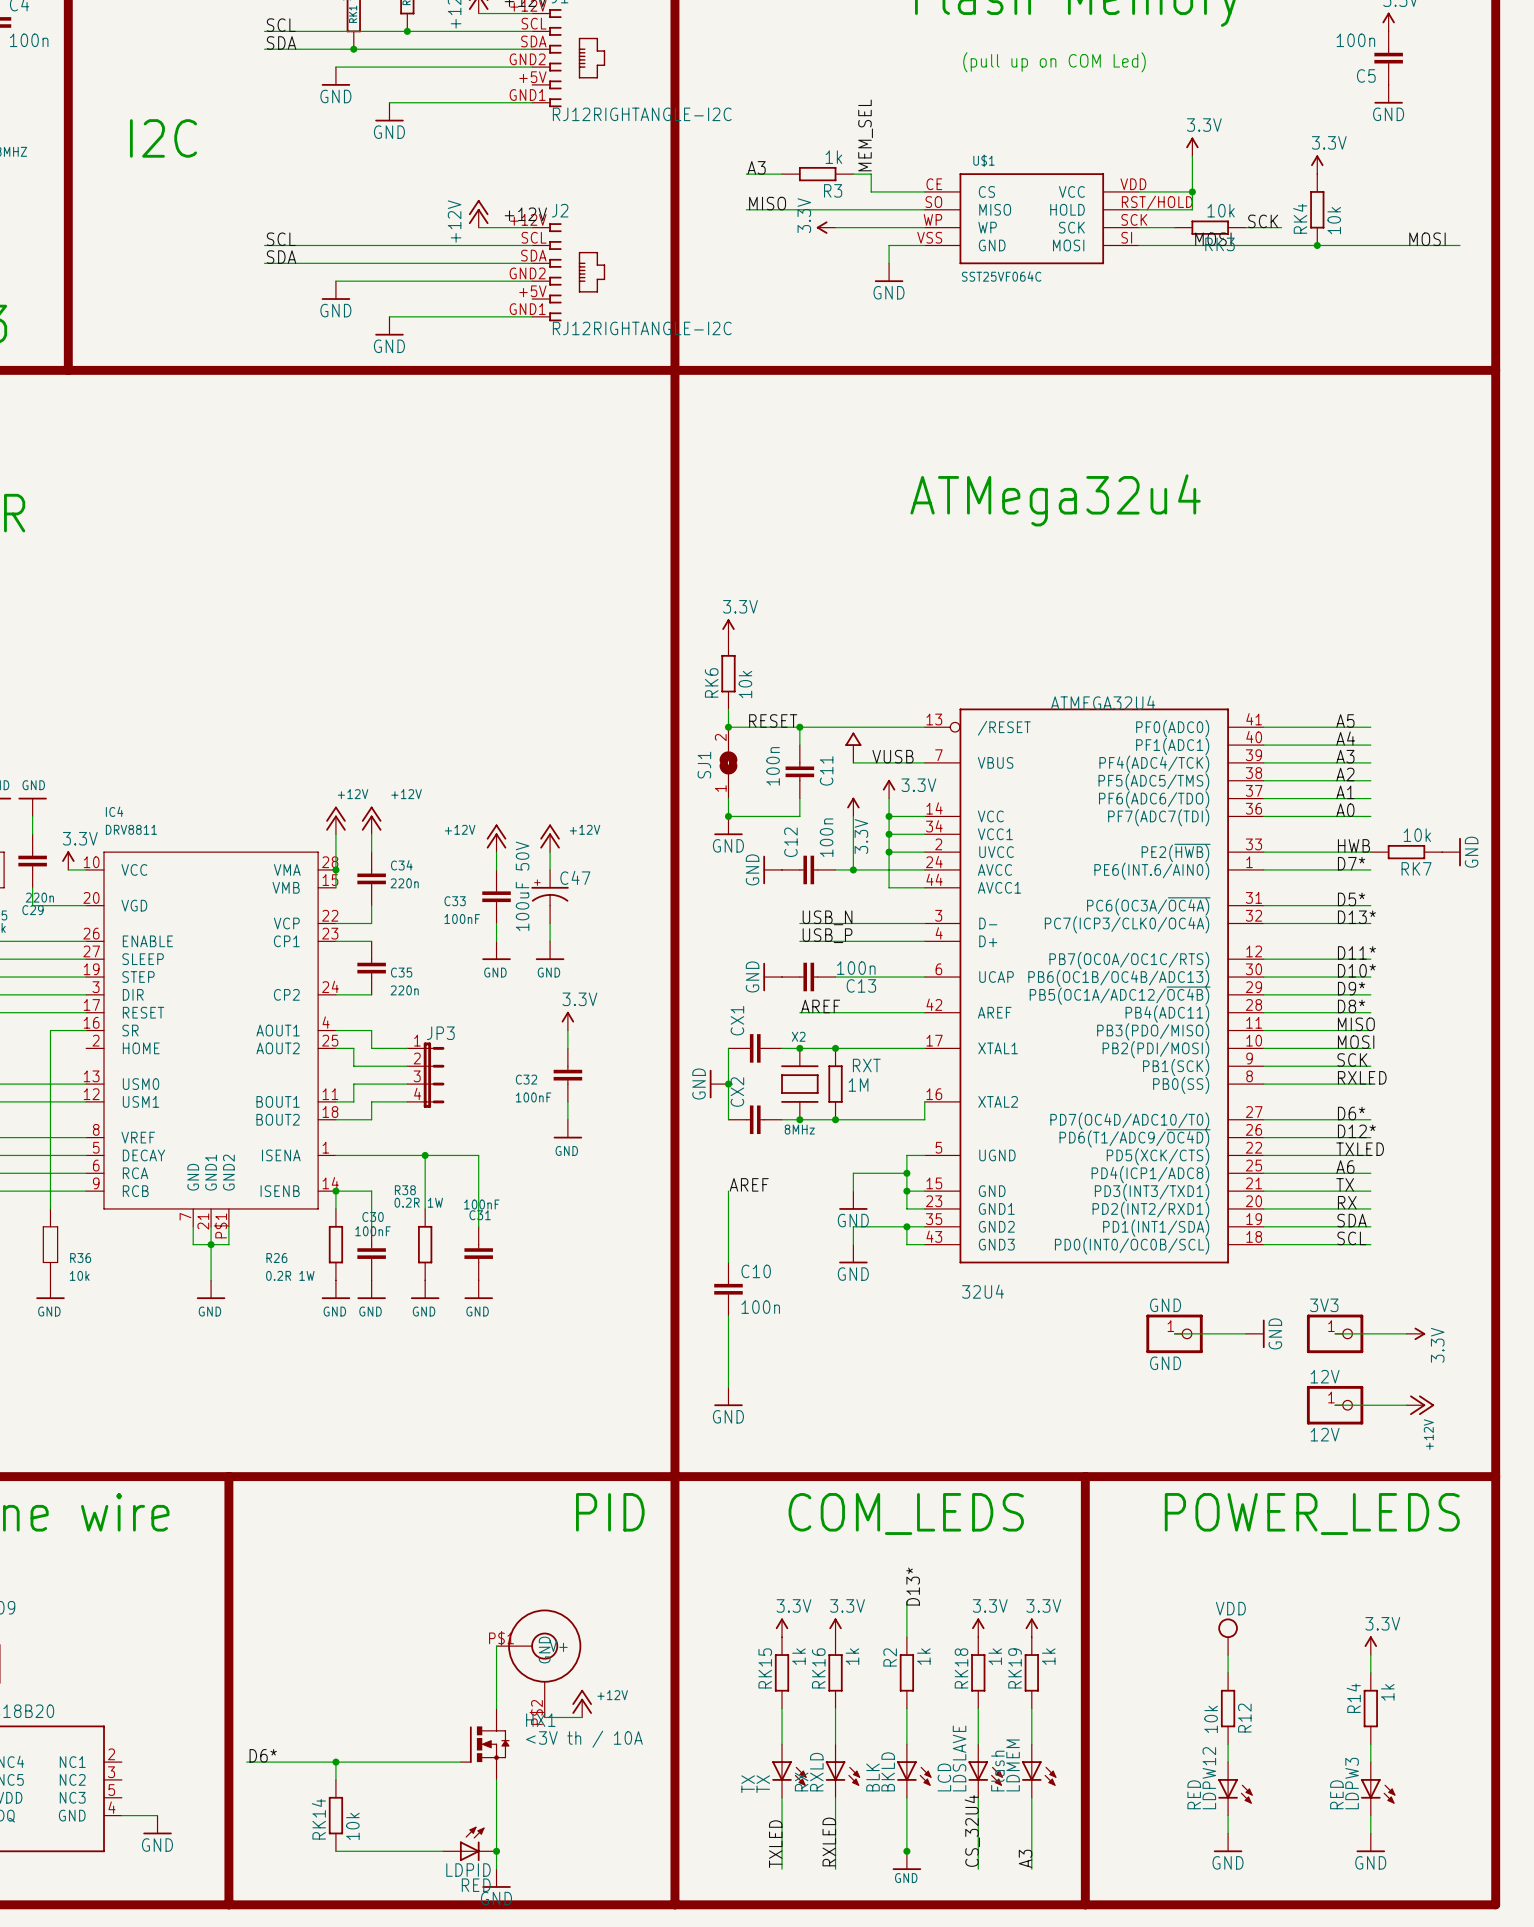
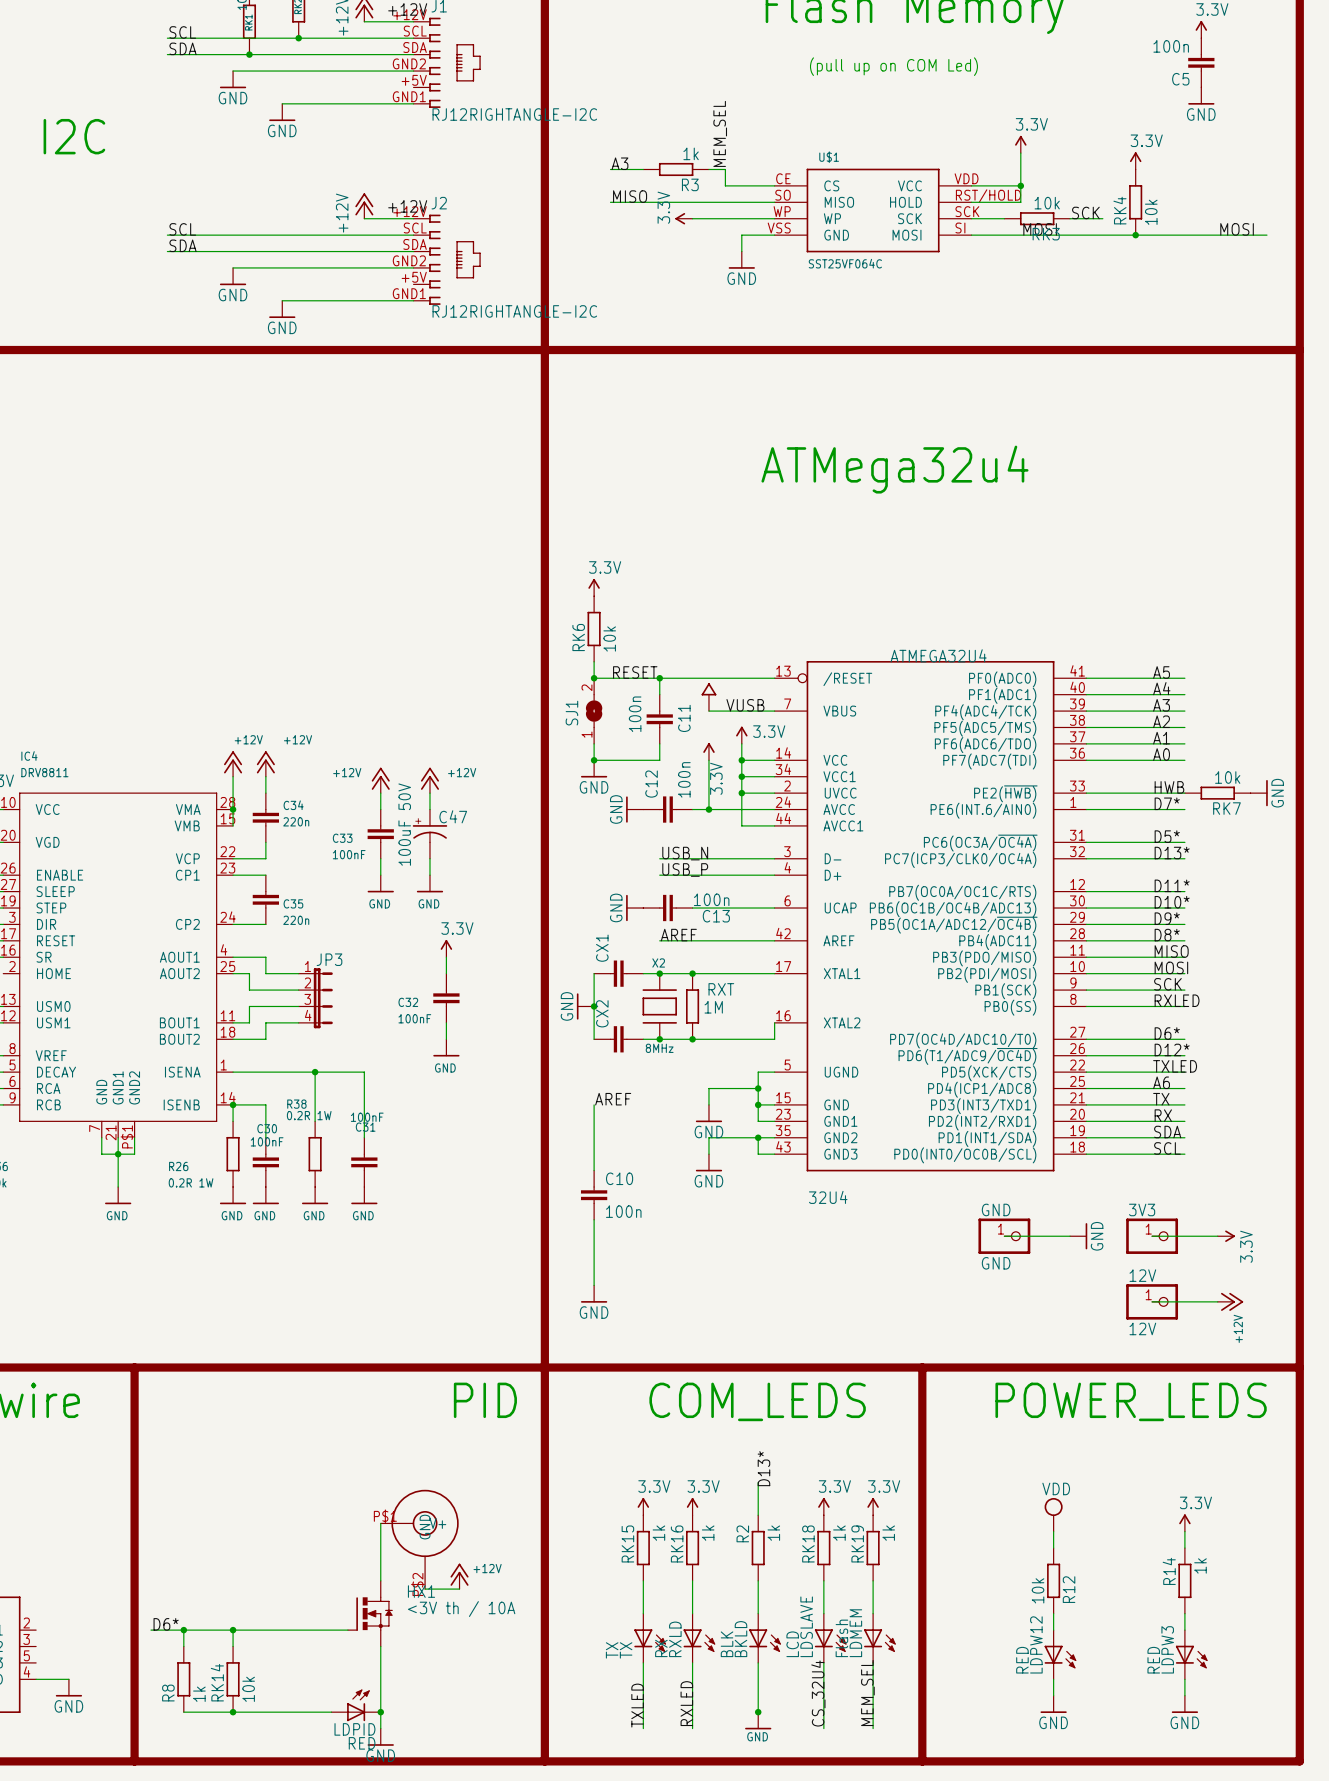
wire: none -> (183, 1630) (183, 1646)
junction: none -> (183, 1630)
R8: none -> 1k (183, 1679)
wire: none -> (183, 1712) (233, 1712)
junction: none -> (233, 1712)
label: A3 (1025, 1858) -> MEM_SEL (867, 1693)

